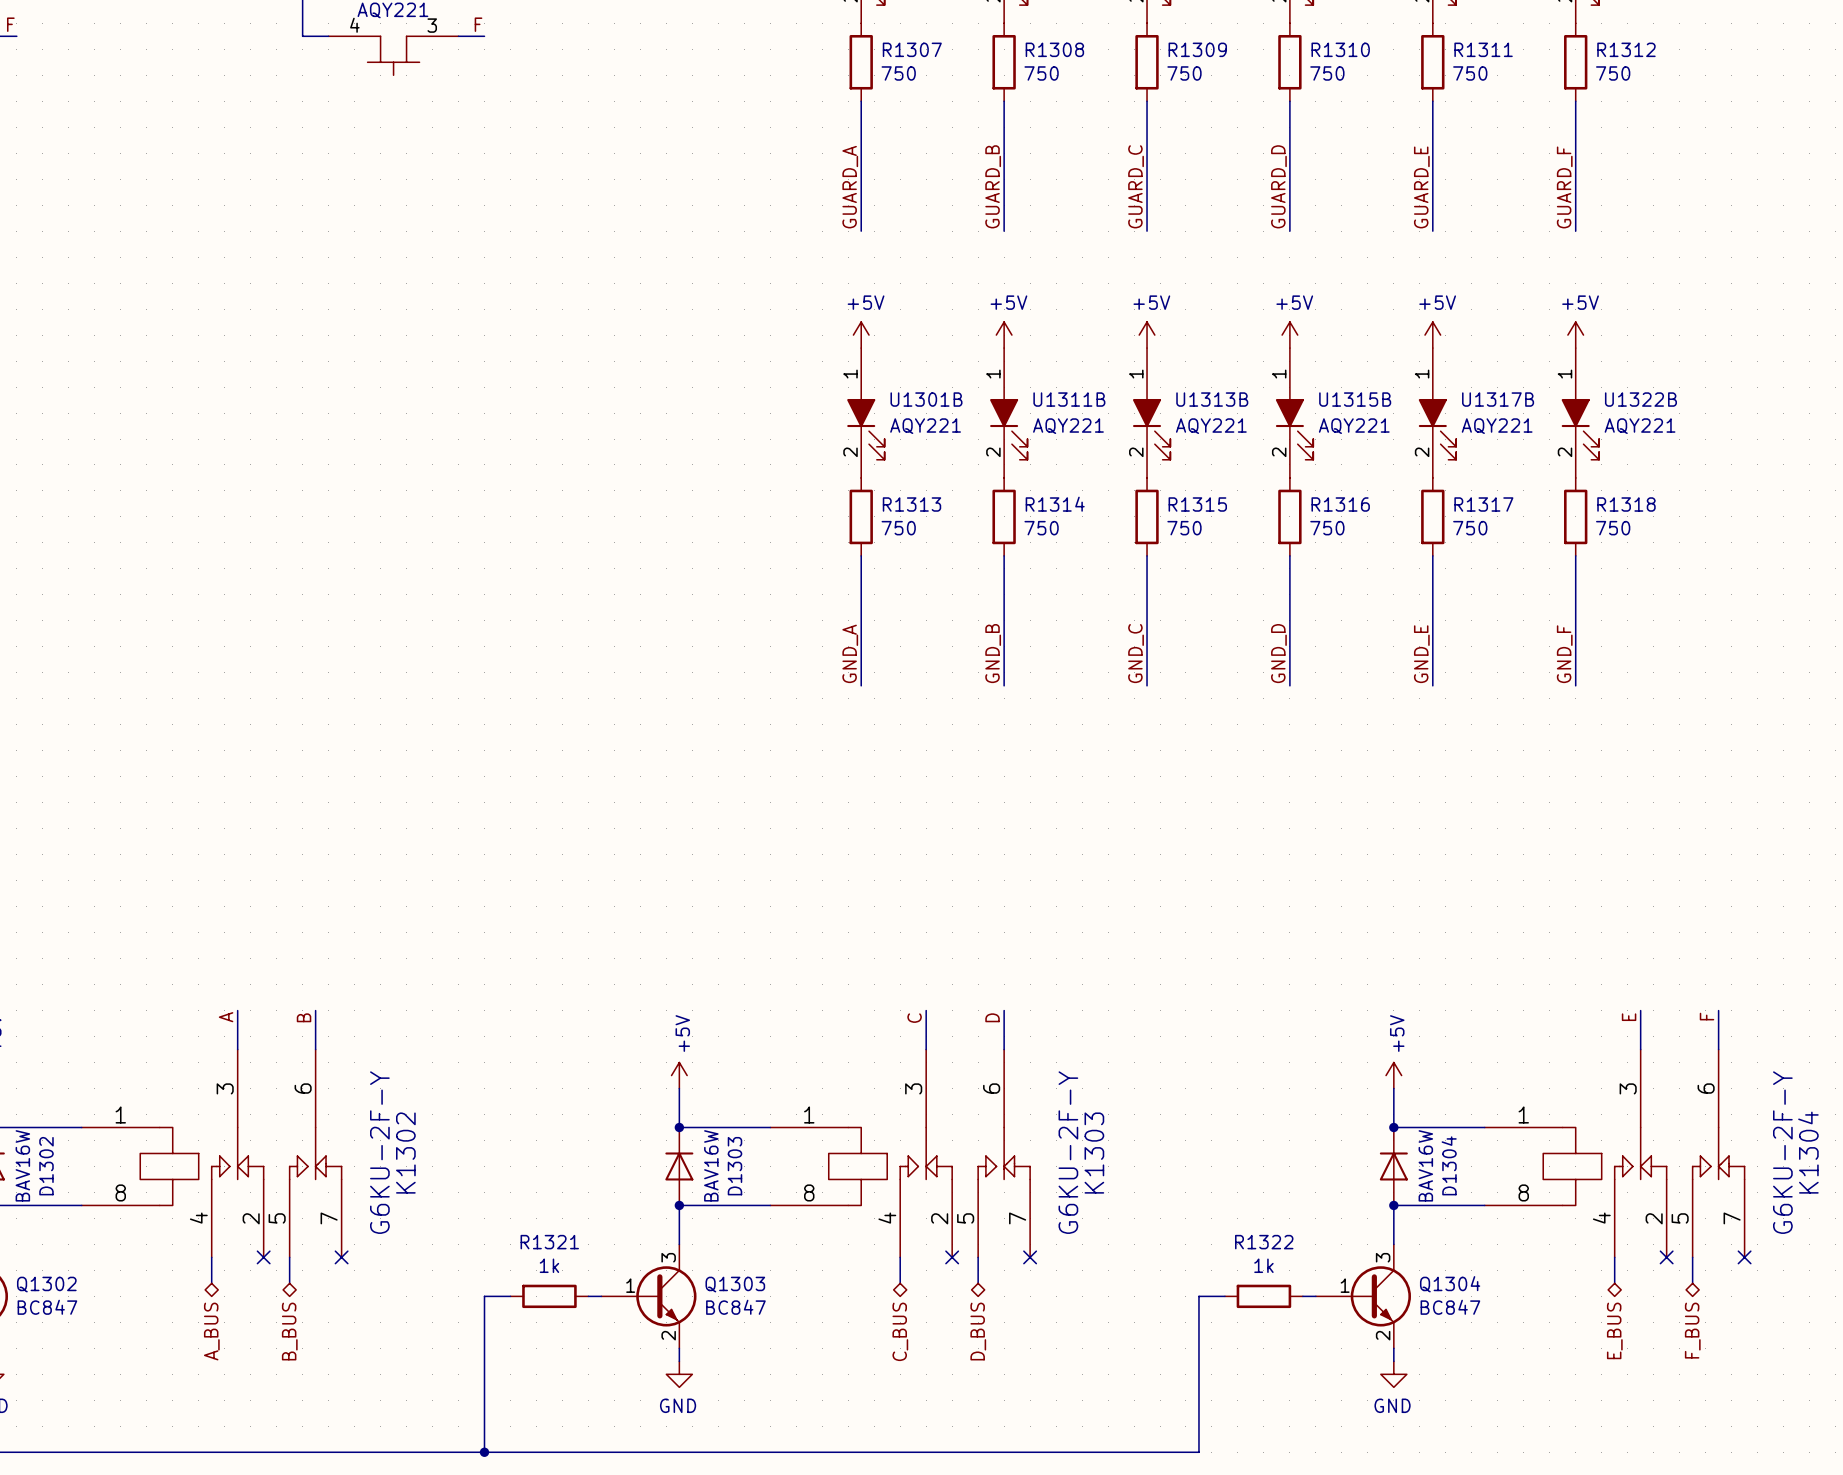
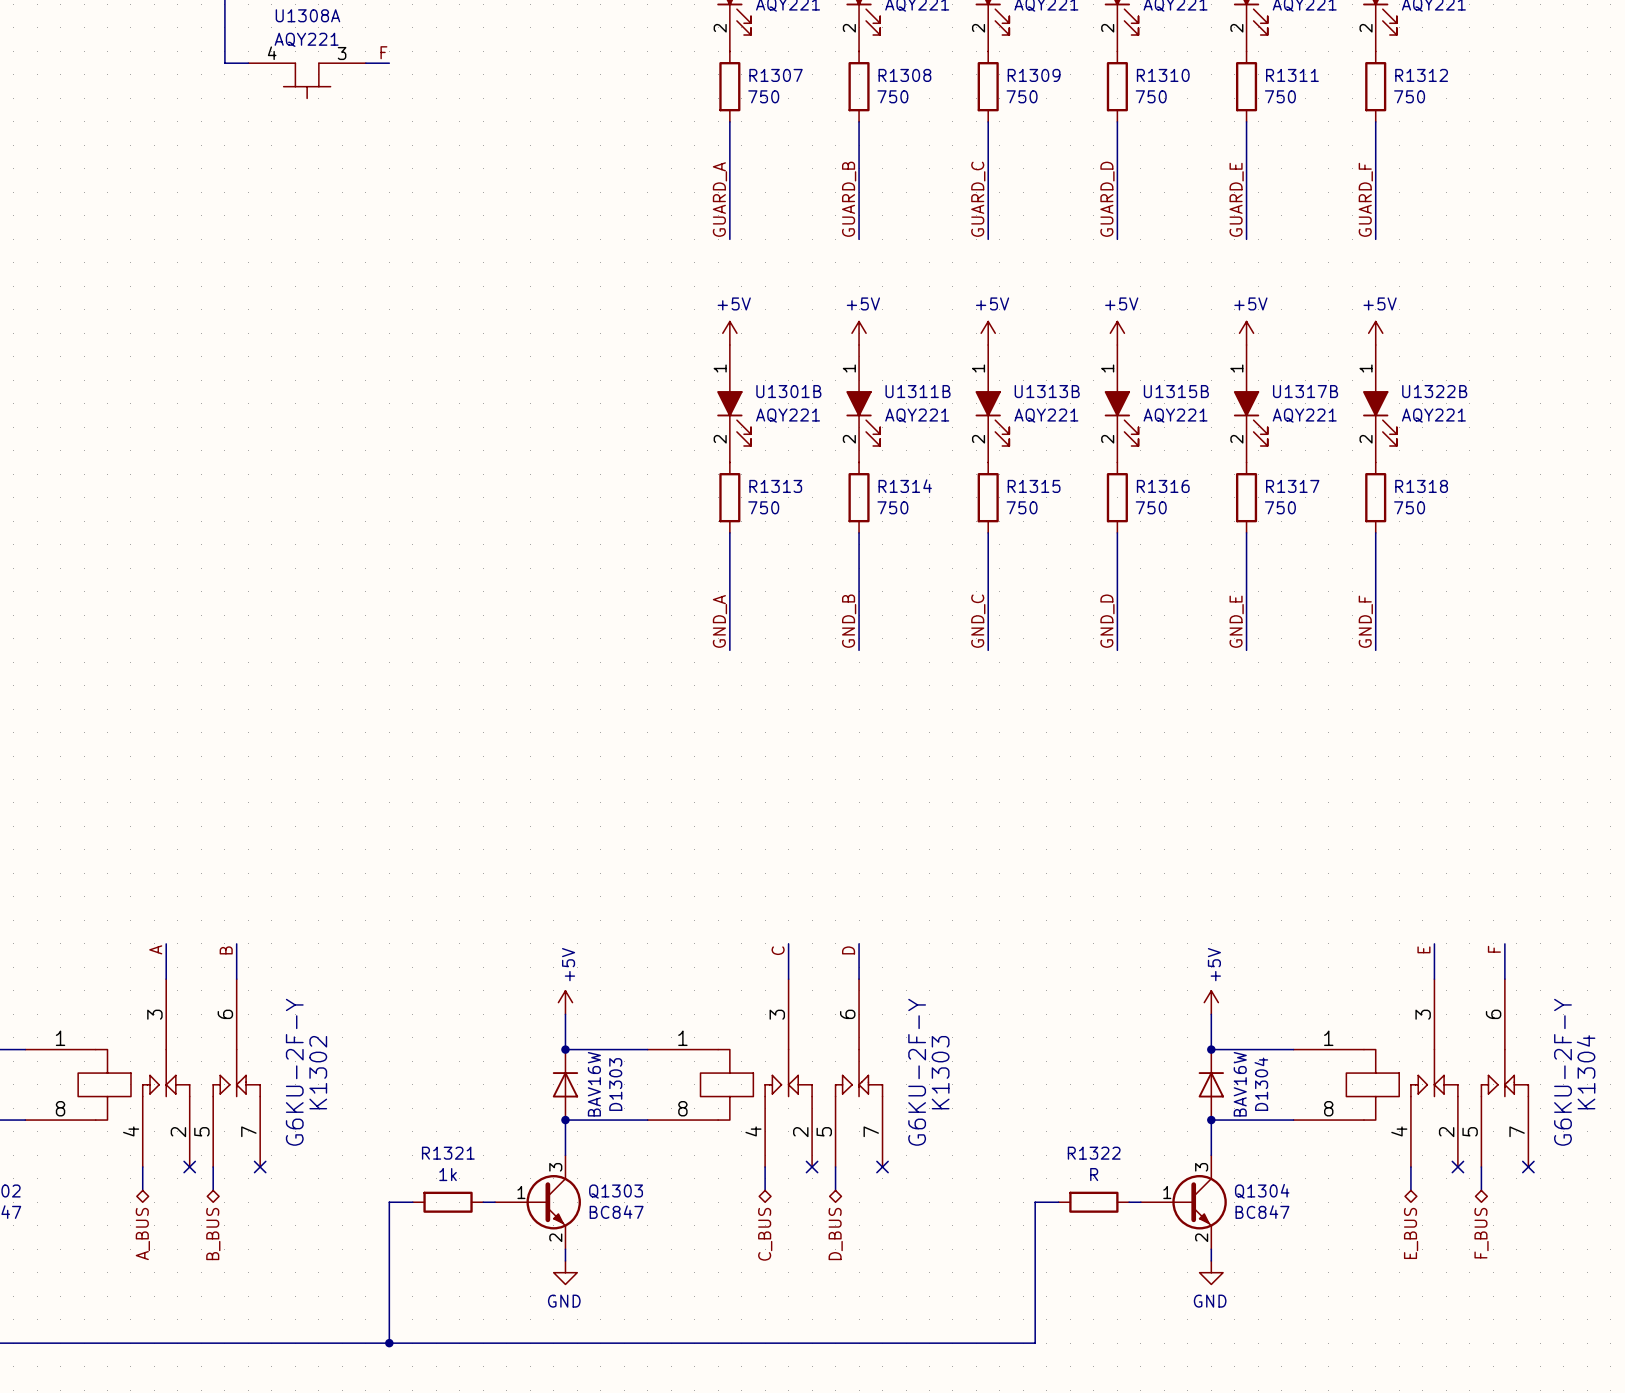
R1322 value: 1k (1263, 1265) -> R (1094, 1174)

